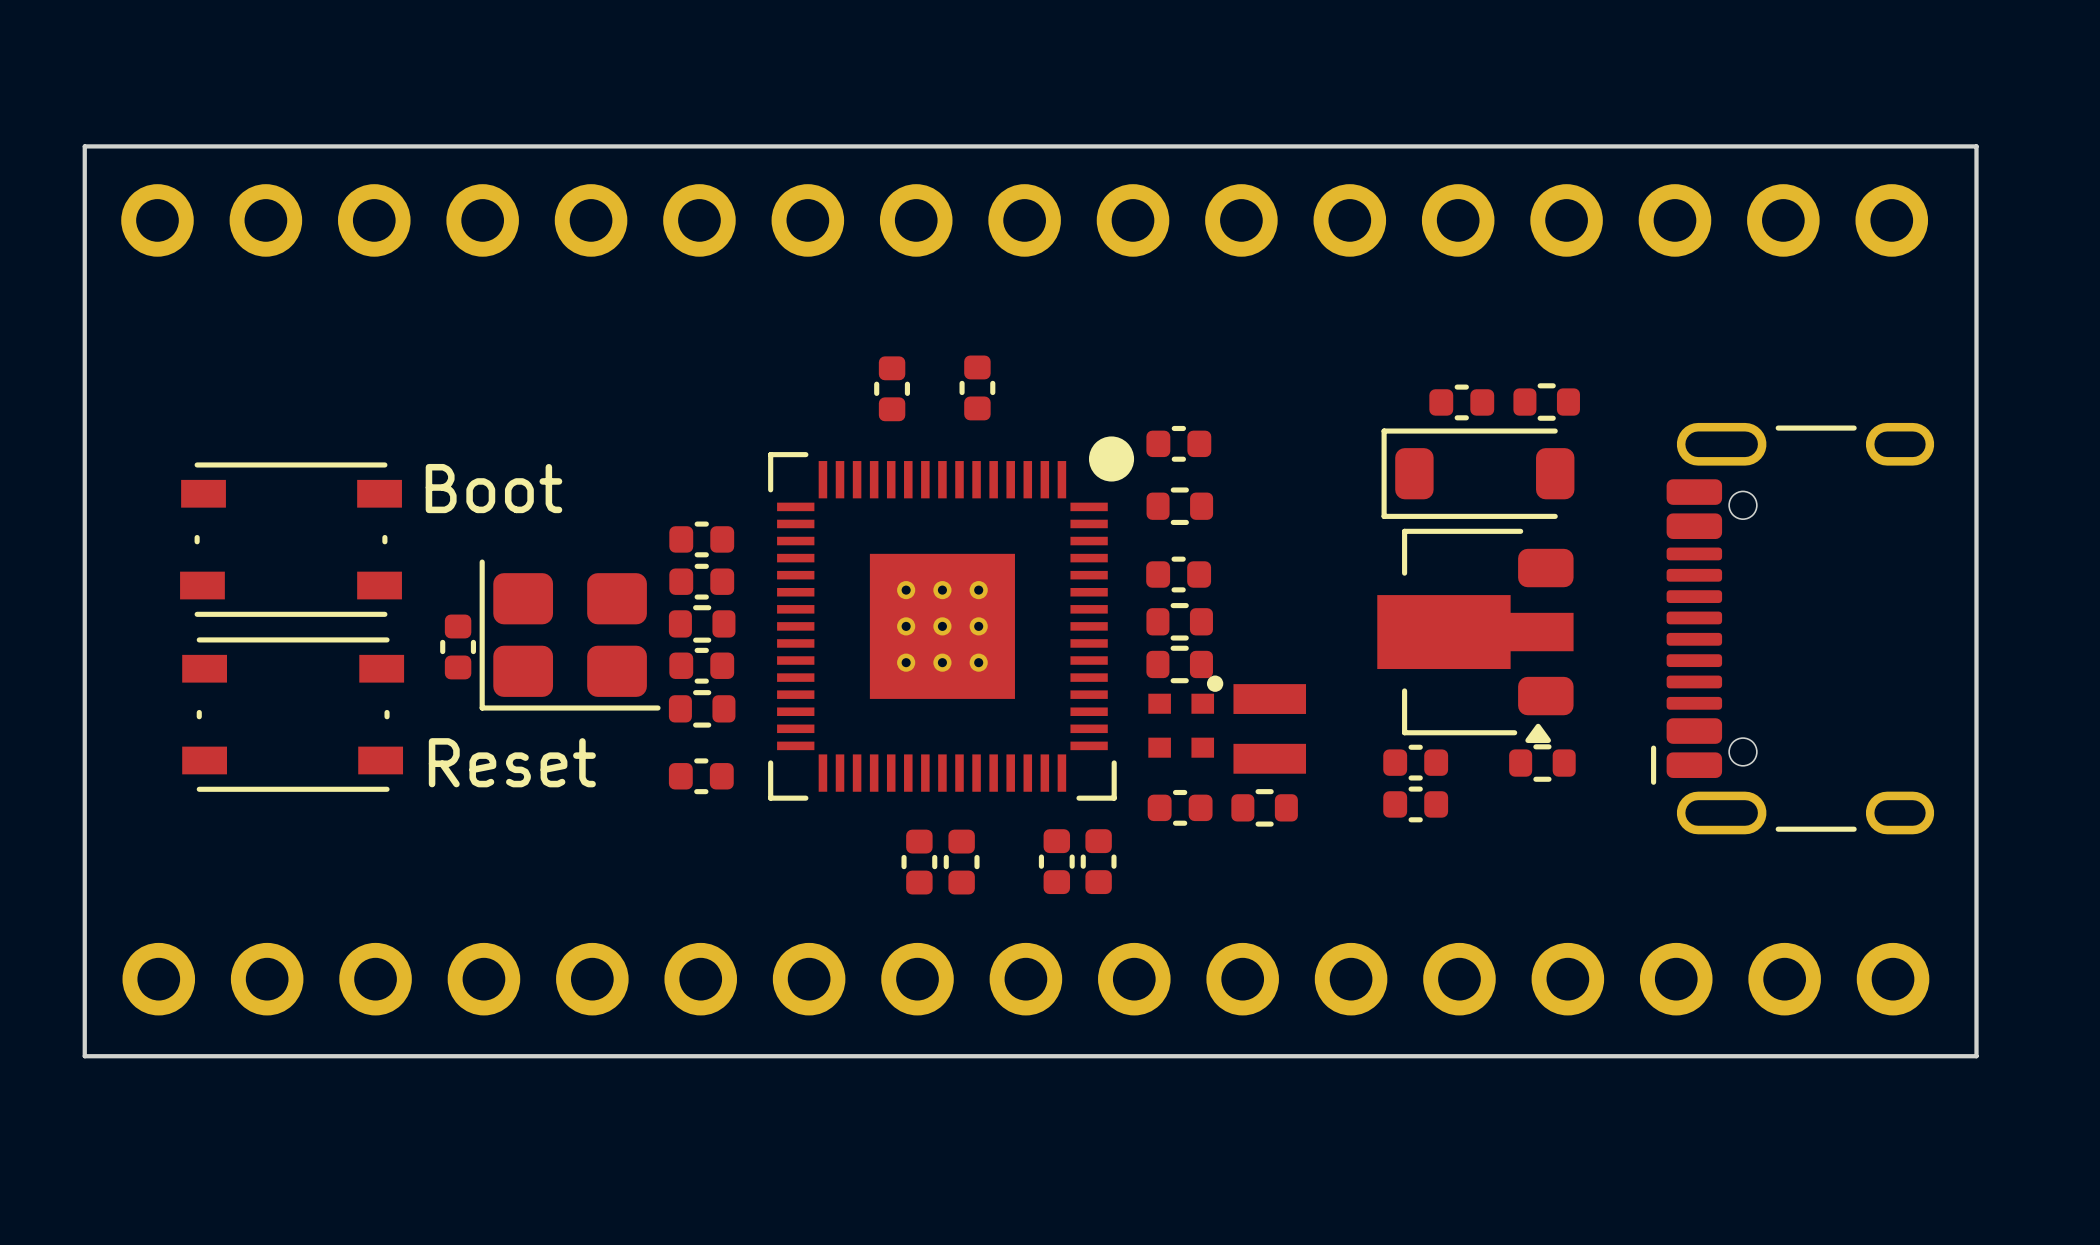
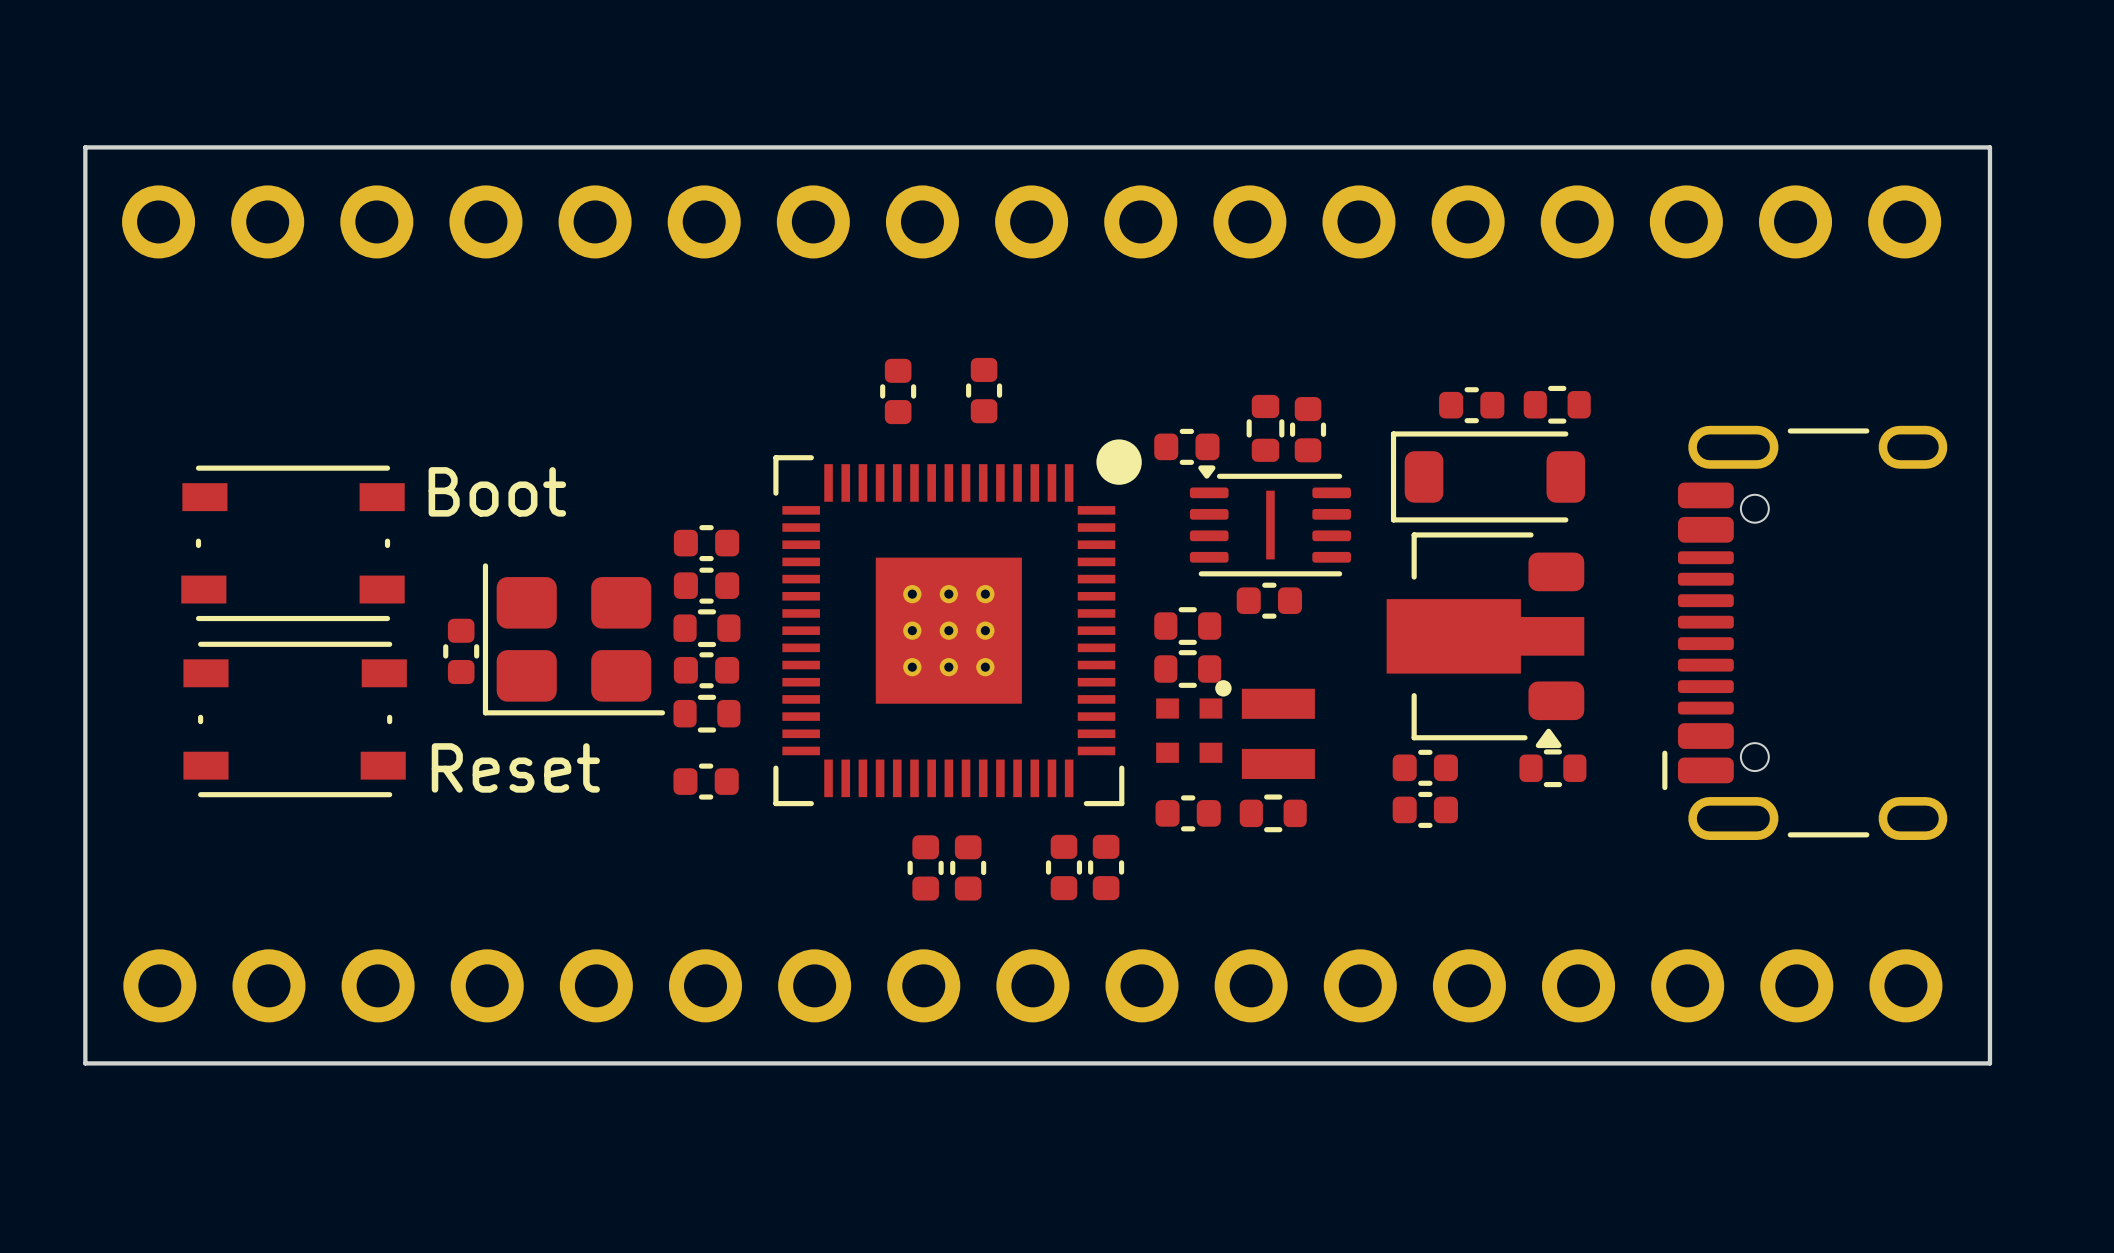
part: none -> (1308, 429)
part rotation: 0° (1179, 506) -> 90° clockwise (1265, 428)
part position: (1179, 506) -> (1265, 428)
part: none -> (1270, 520)
part position: (1178, 574) -> (1269, 600)

